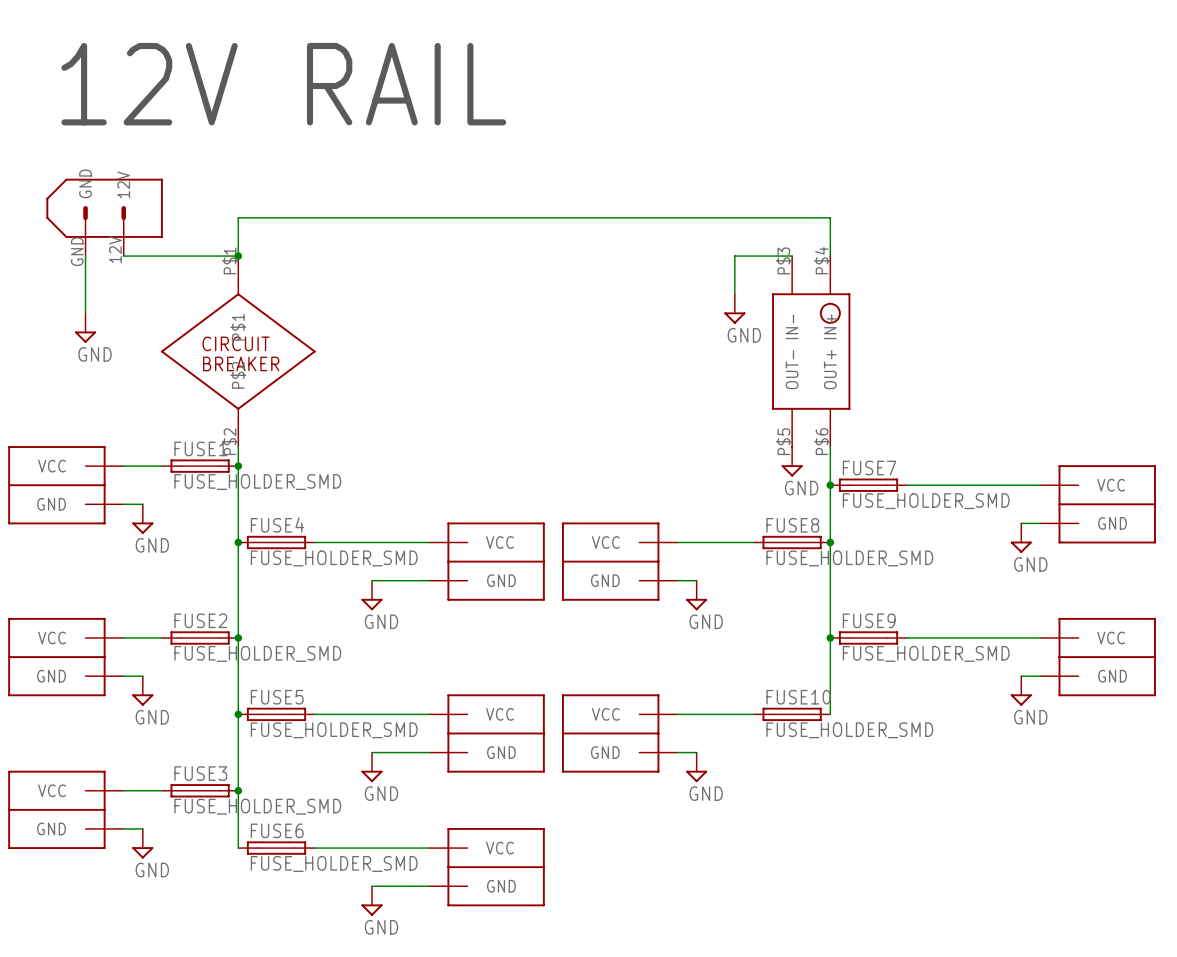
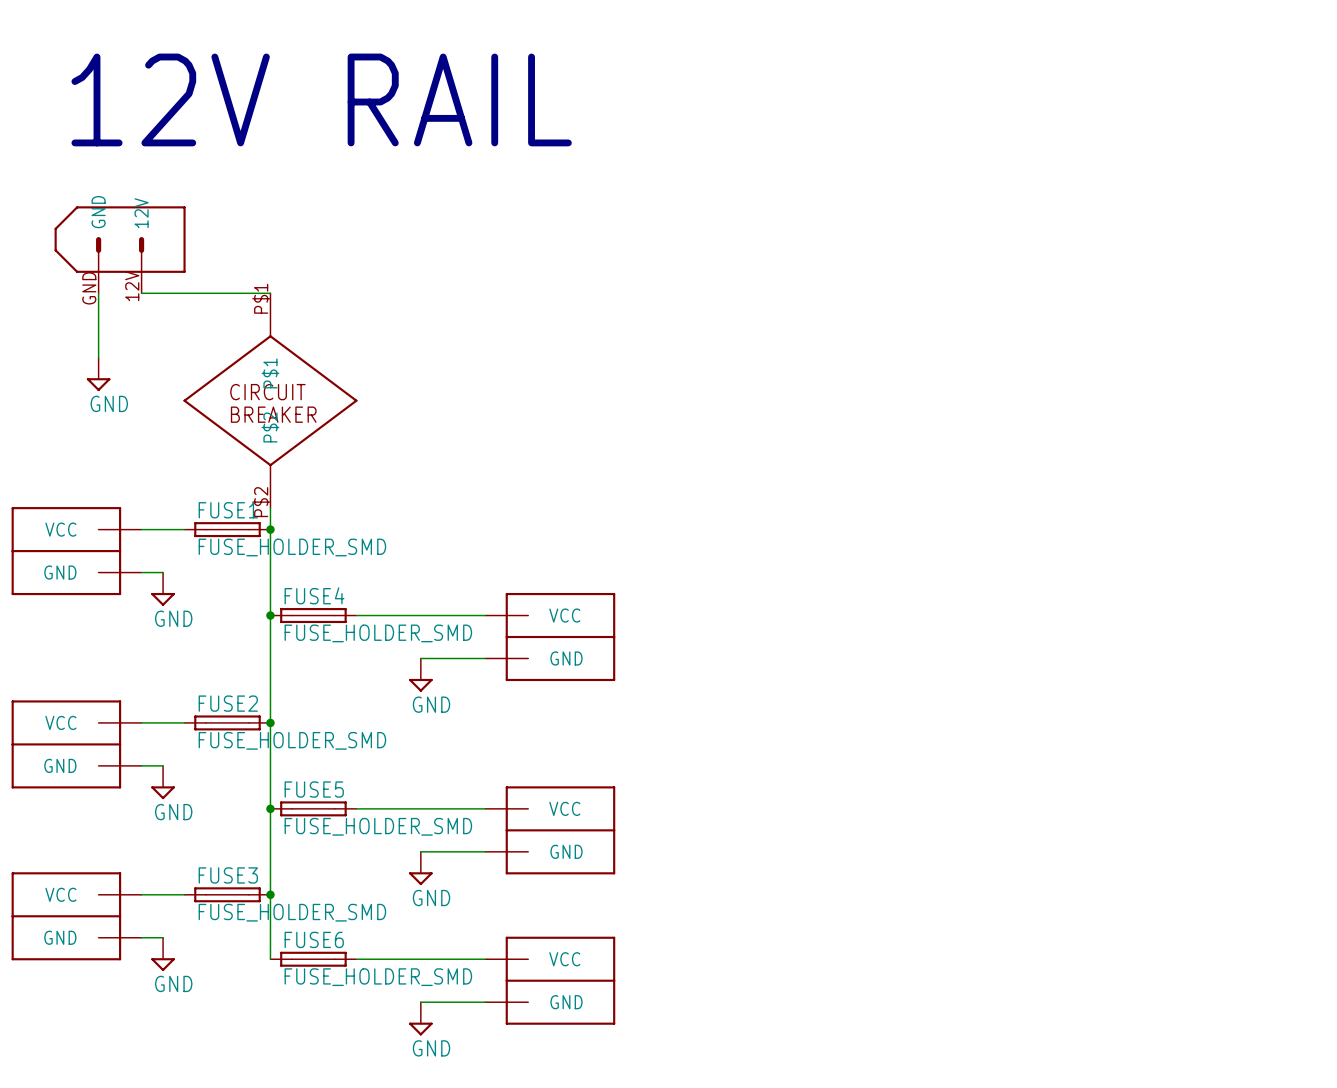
wire: (238, 256) (238, 217) (830, 217) (830, 256) -> none
junction: (238, 256) -> none
wire: (792, 256) (734, 256) (734, 294) -> none
power symbol: GND (734, 309) -> none
part: (811, 351) -> none
wire: (830, 447) (830, 714) -> none
power symbol: GND (792, 461) -> none
junction: (830, 485) -> none
FUSE7: FUSE_HOLDER_SMD (868, 485) -> none
wire: (906, 485) (1040, 485) -> none
part: (1098, 504) -> none
wire: (1021, 523) (1040, 523) -> none
power symbol: GND (1021, 538) -> none
wire: (677, 542) (753, 542) -> none
FUSE8: FUSE_HOLDER_SMD (792, 542) -> none
junction: (830, 542) -> none
part: (619, 561) -> none
wire: (677, 580) (696, 580) -> none
power symbol: GND (696, 595) -> none
junction: (830, 637) -> none
FUSE9: FUSE_HOLDER_SMD (868, 637) -> none
wire: (906, 637) (1040, 637) -> none
part: (1098, 657) -> none
wire: (1021, 676) (1040, 676) -> none
power symbol: GND (1021, 690) -> none
wire: (677, 714) (753, 714) -> none
FUSE10: FUSE_HOLDER_SMD (792, 714) -> none
part: (619, 733) -> none
wire: (677, 752) (696, 752) -> none
power symbol: GND (696, 767) -> none

